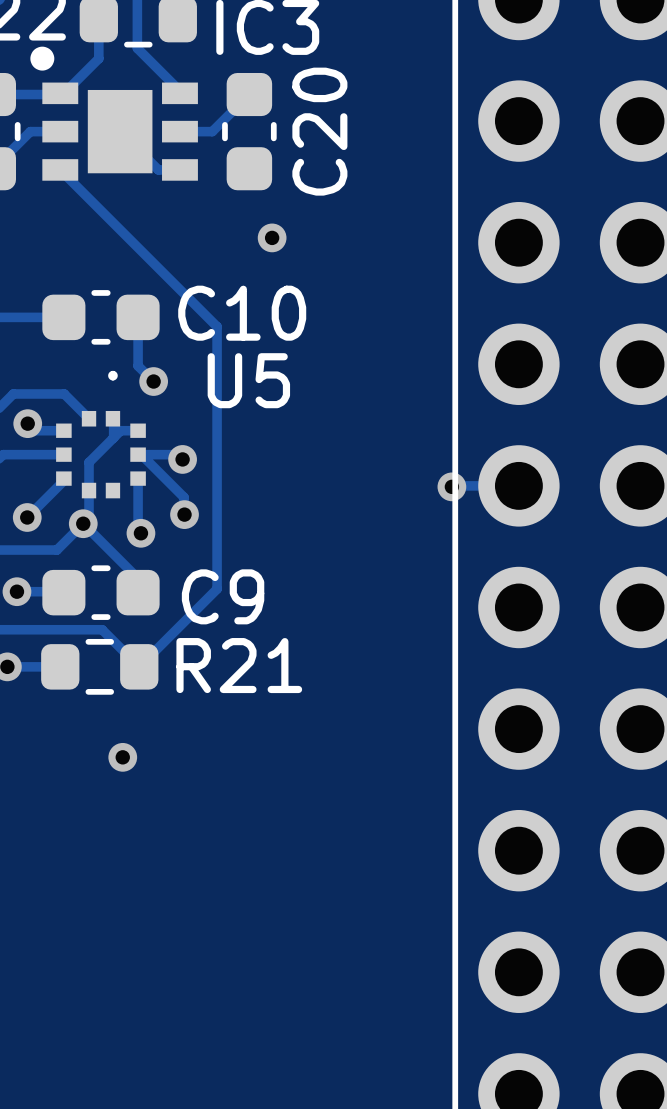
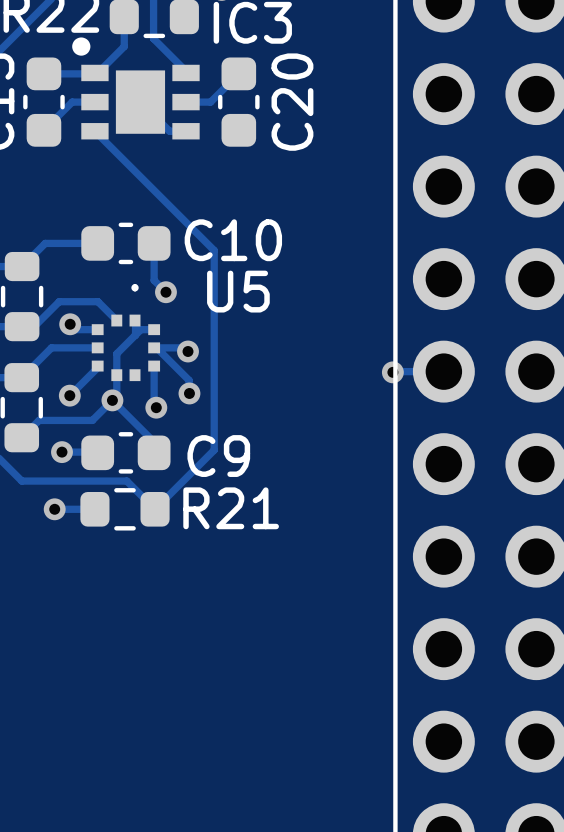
via: (272, 237) -> none
via: (122, 757) -> none

